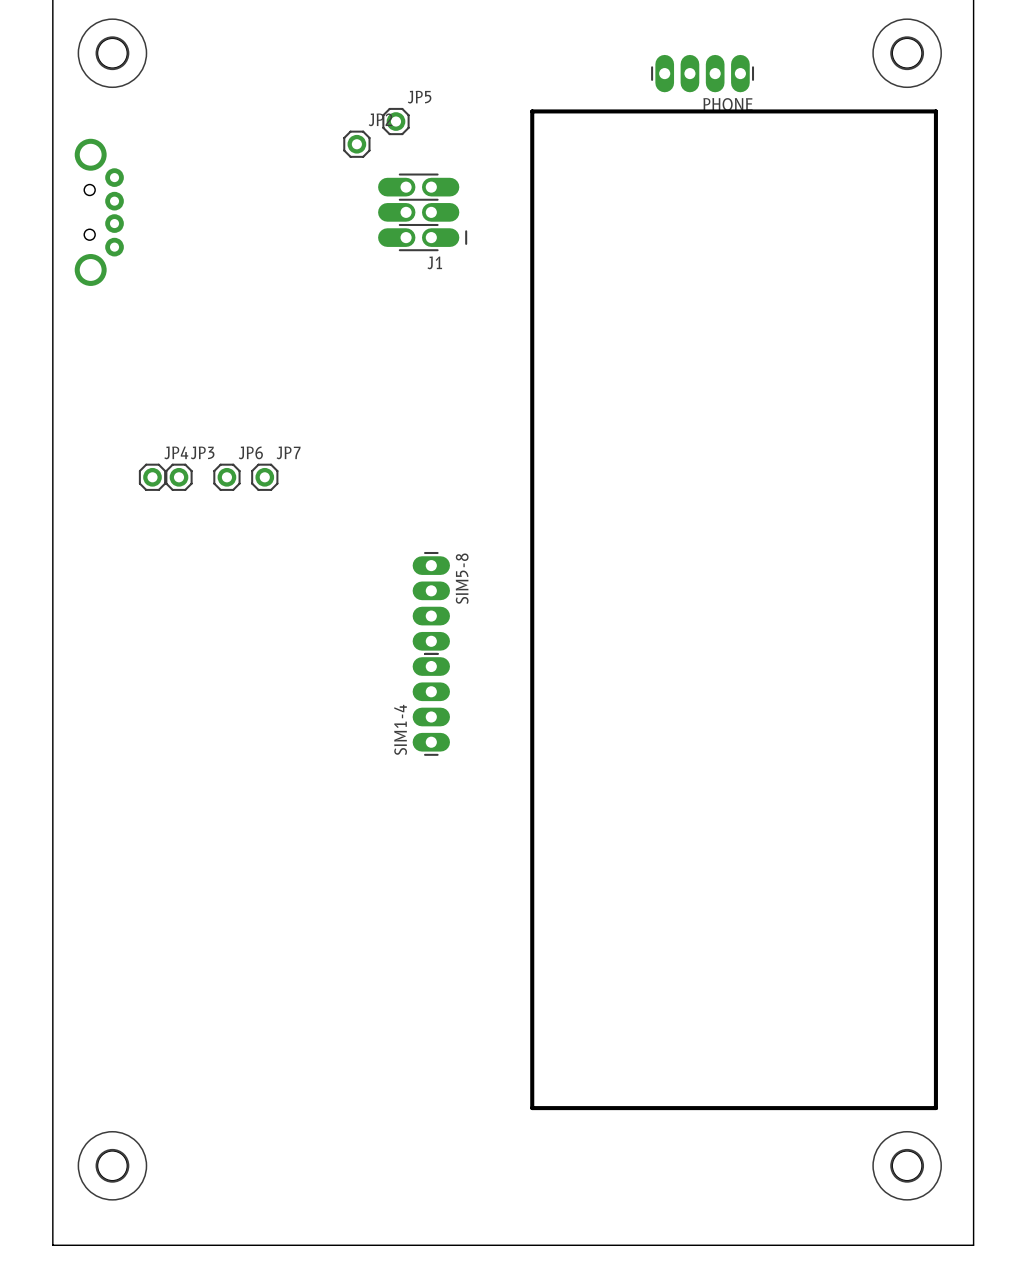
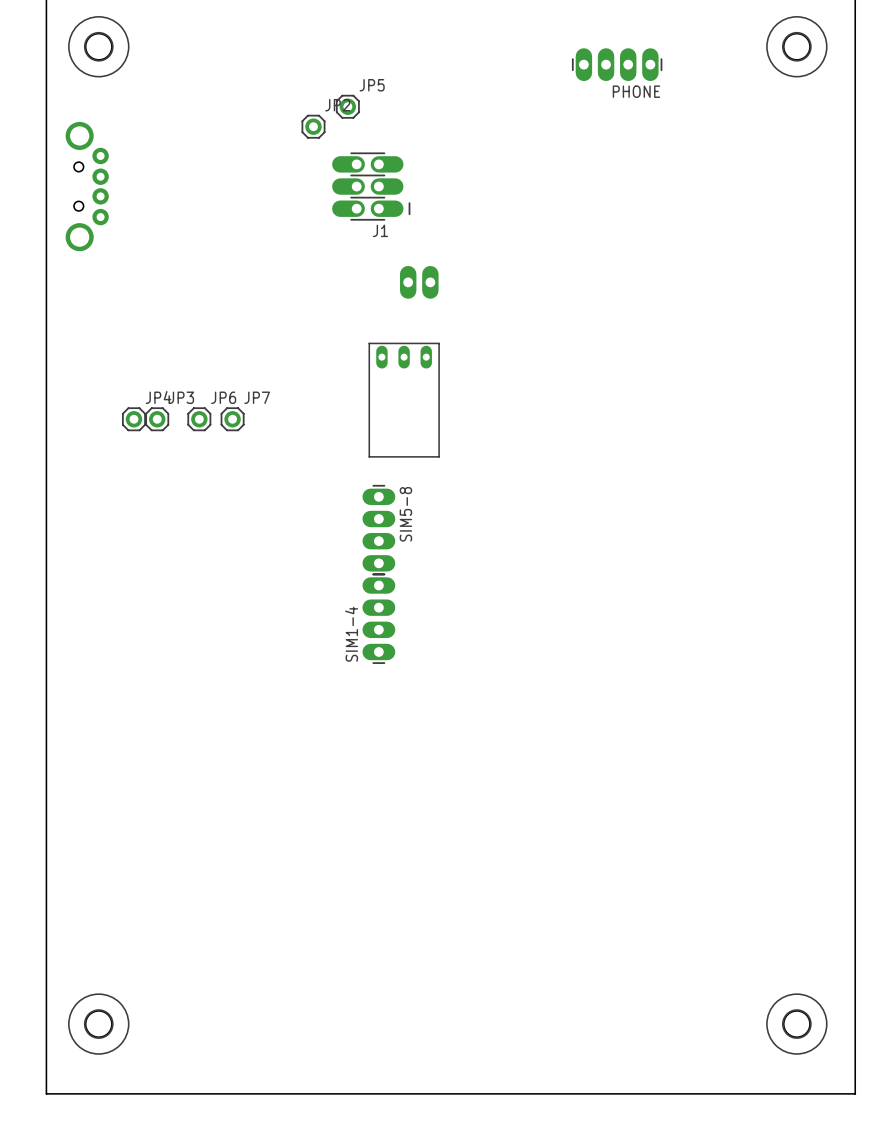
board edge: (532, 111) (935, 111) (935, 1108) (532, 1108) (532, 111) -> none
part: none -> (419, 282)
part: none -> (404, 400)

